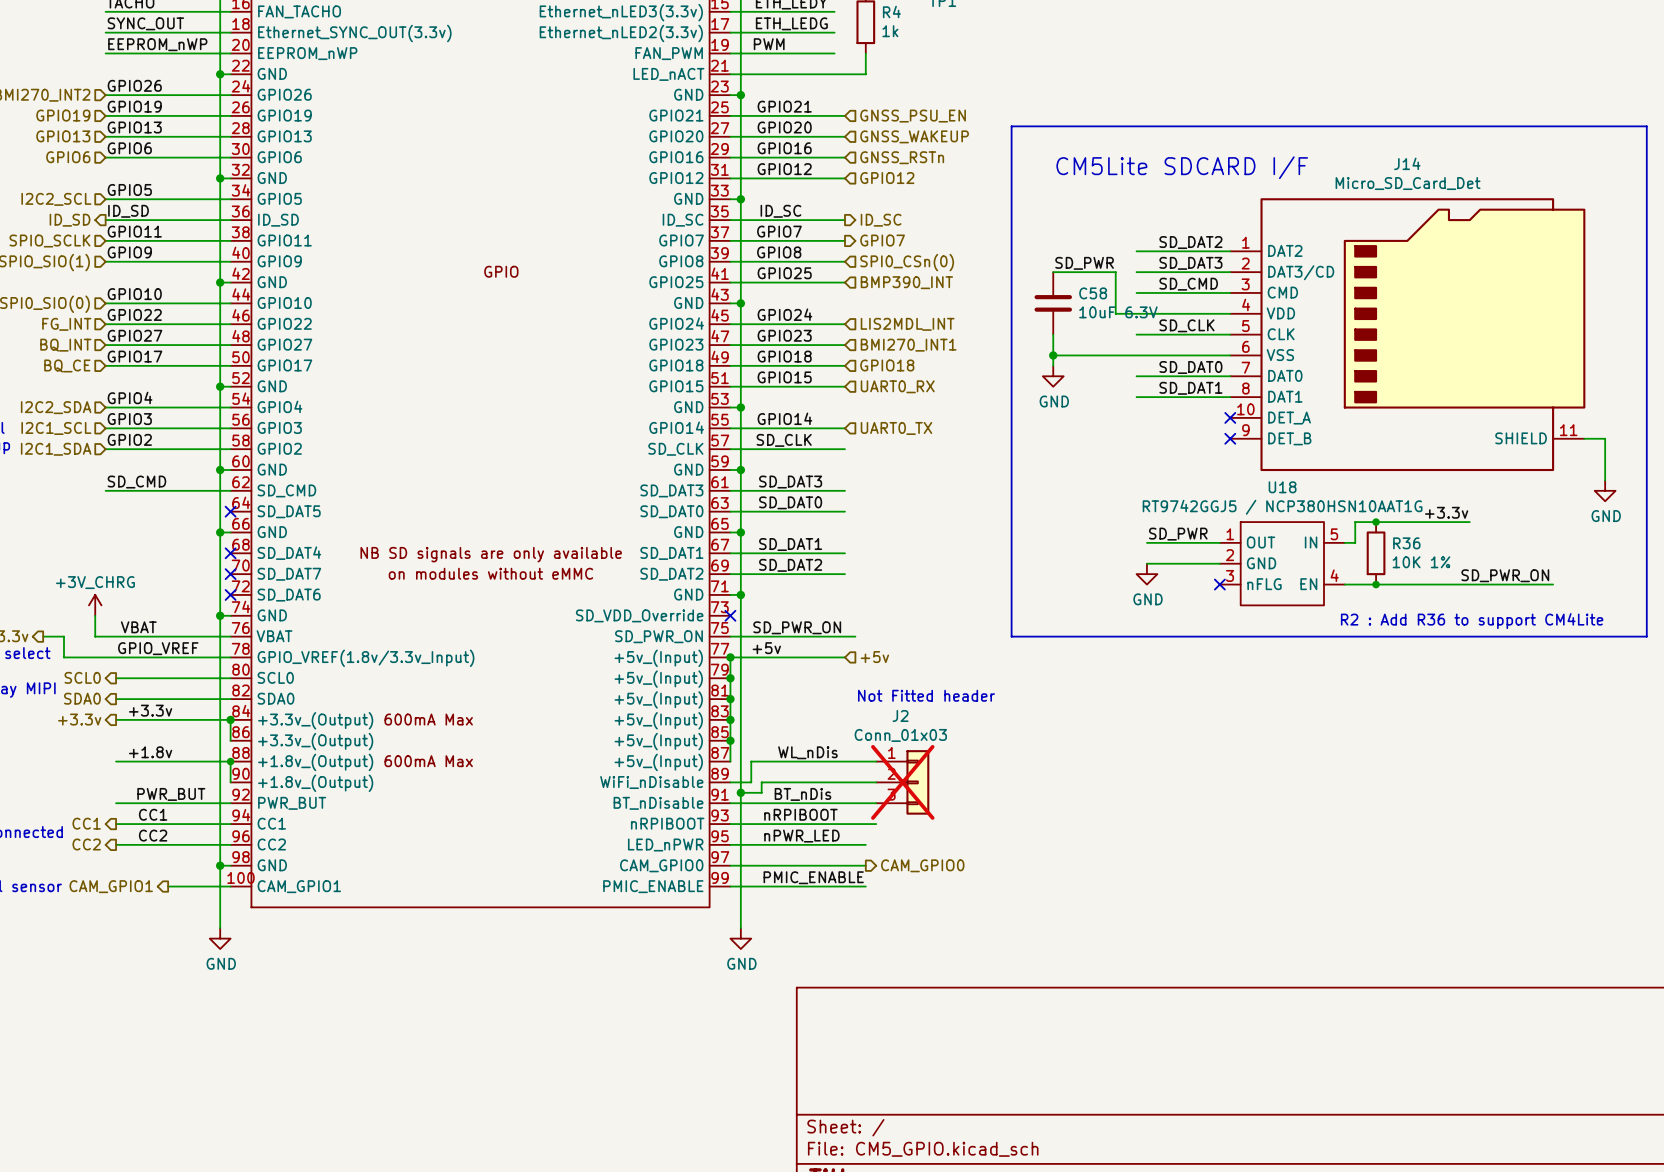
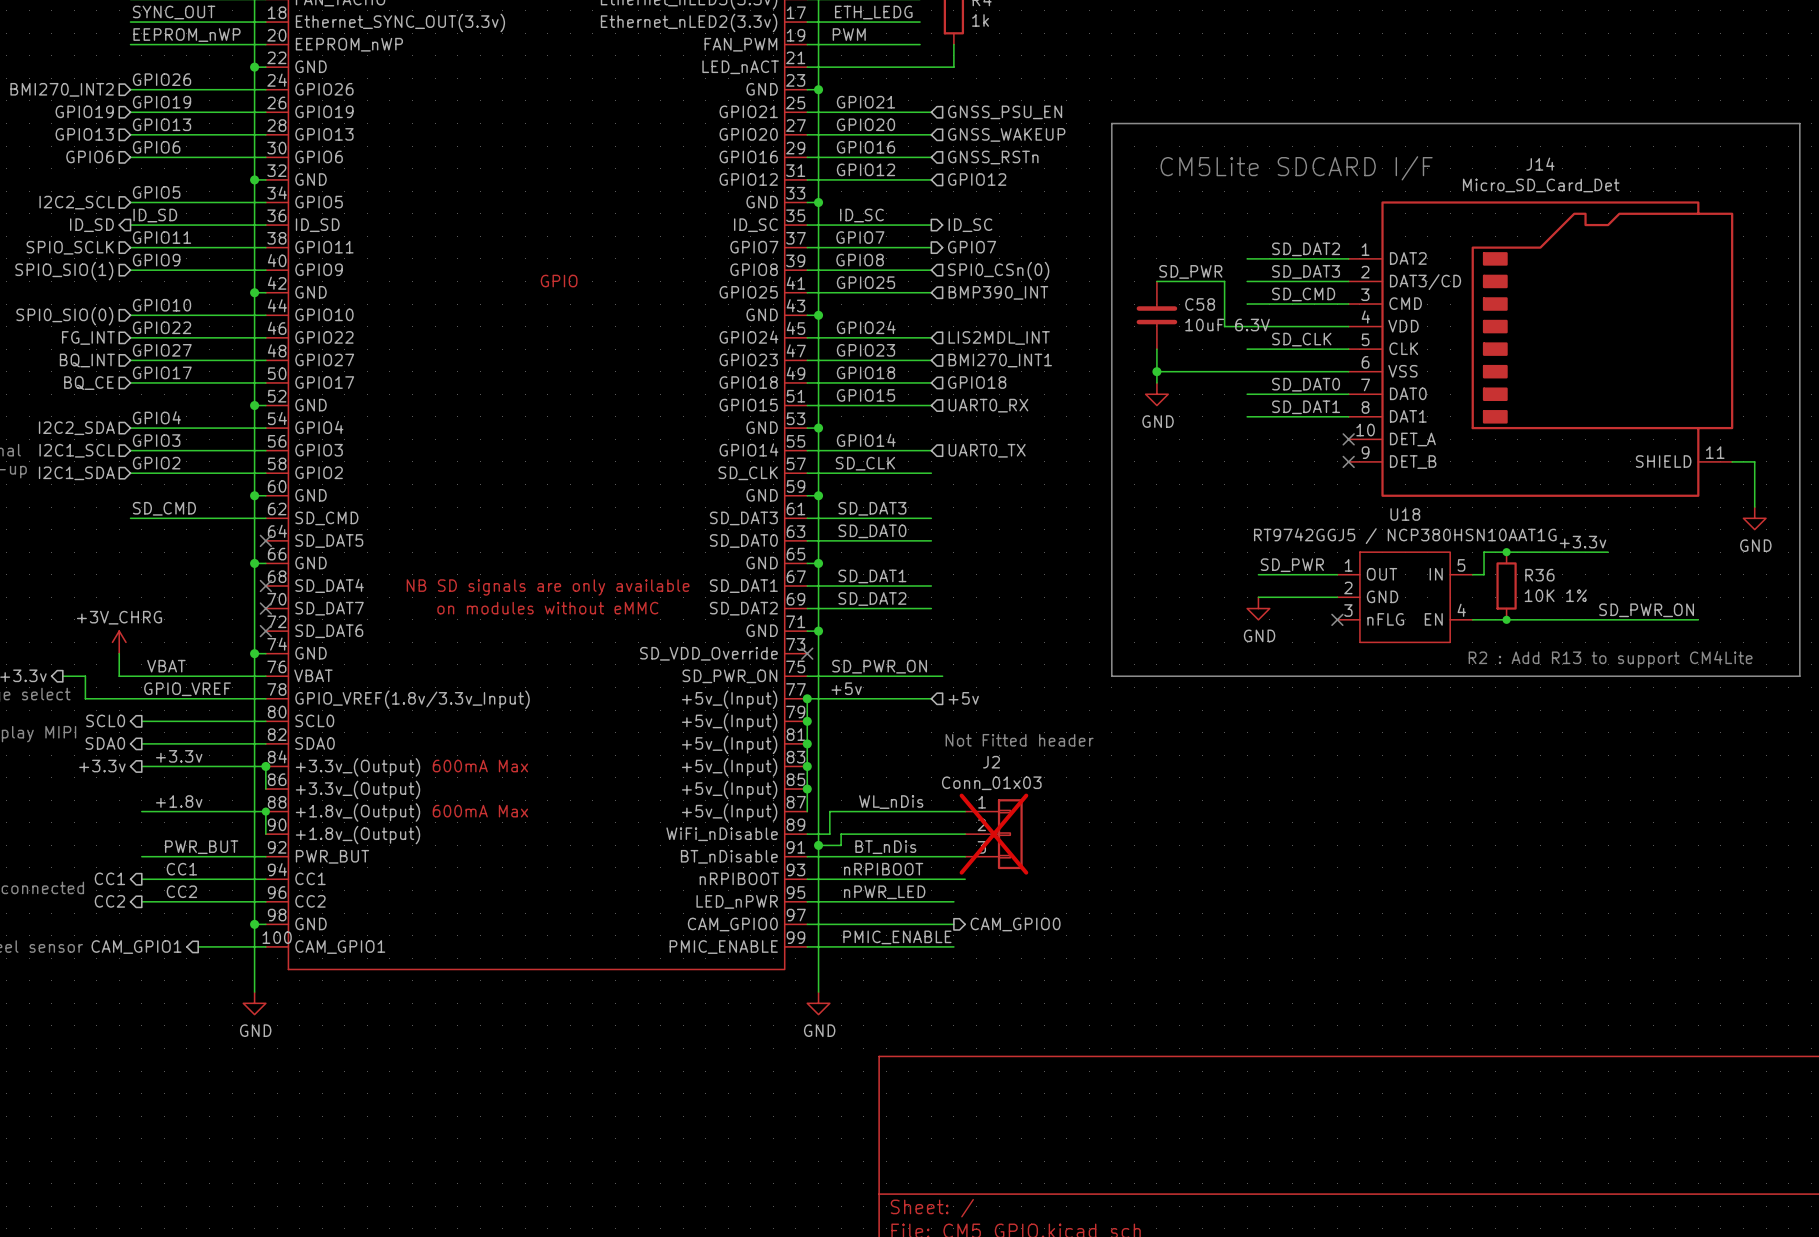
text: R2 : Add R36 to support CM4Lite (1472, 621) -> R2 : Add R13 to support CM4Lite (1610, 659)

